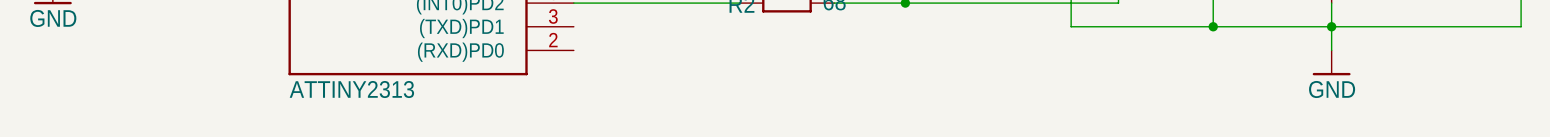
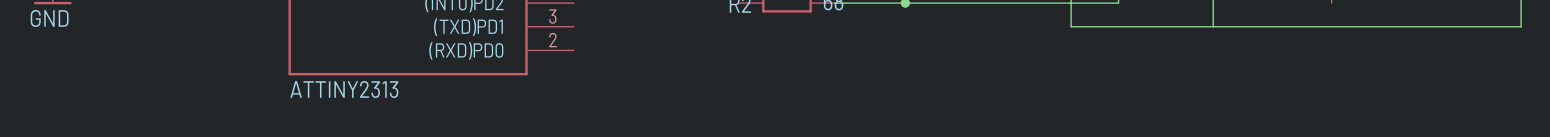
wire: (573, 3) (739, 3) -> none
wire: (1331, 3) (1331, 50) -> none
junction: (1213, 26) -> none
junction: (1331, 26) -> none
power symbol: GND (1331, 62) -> none

